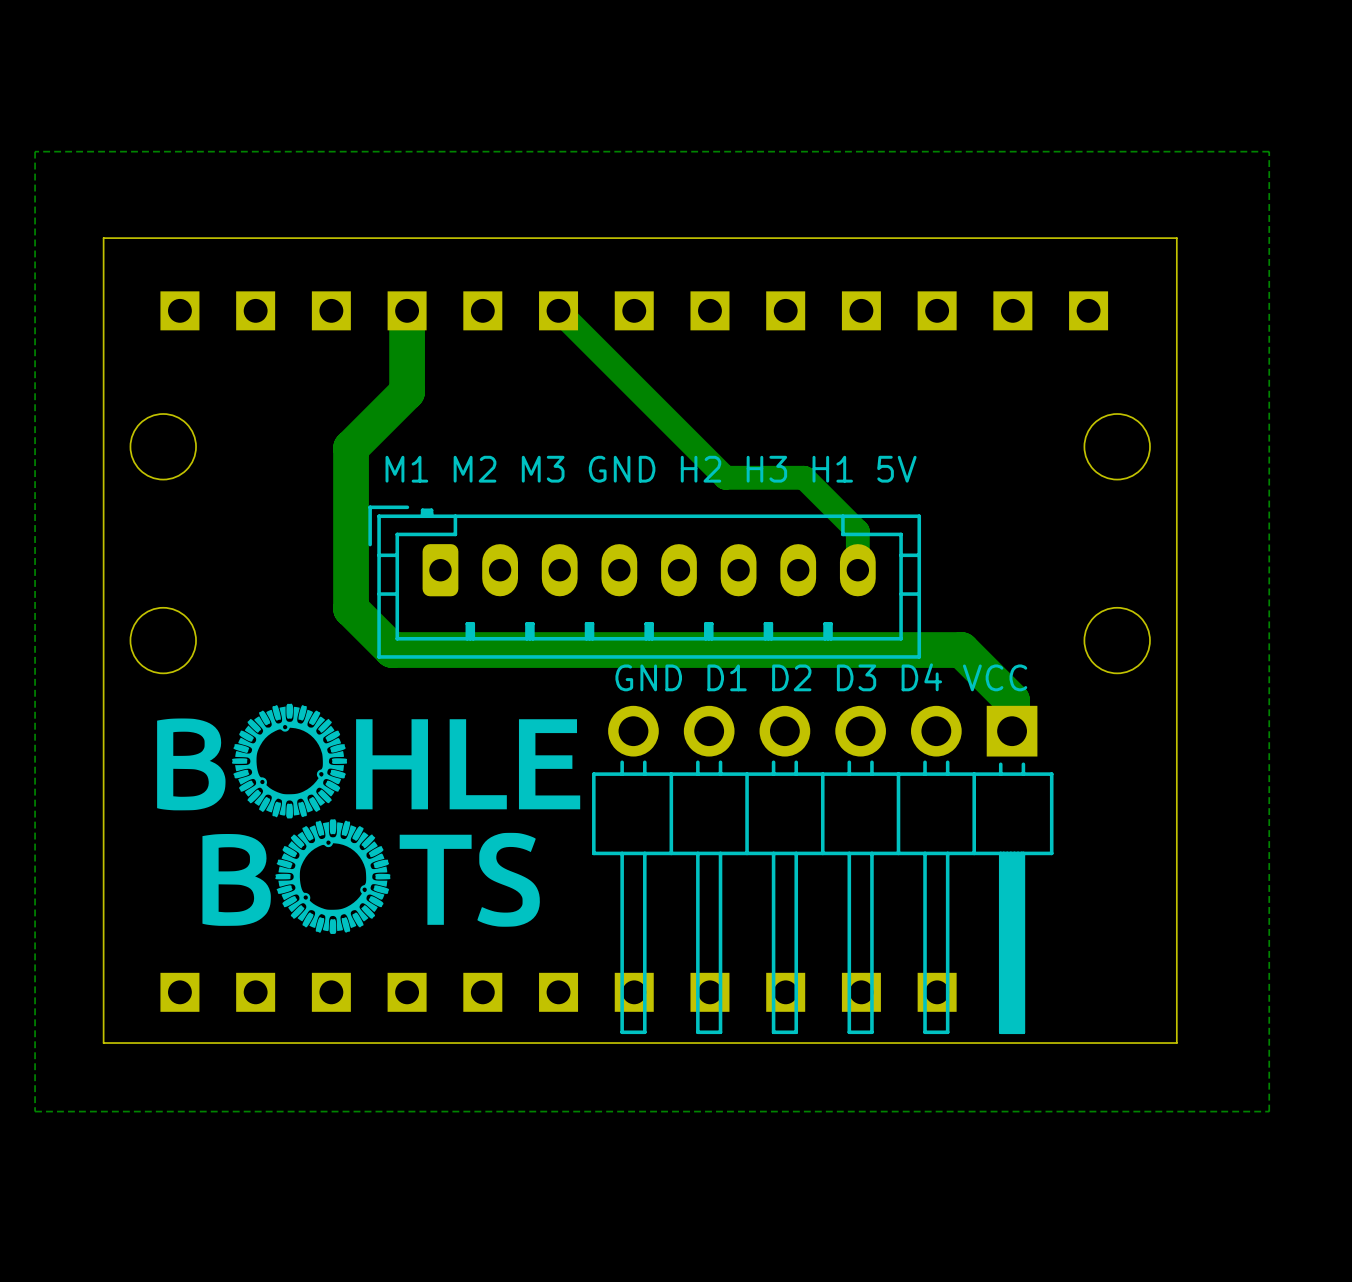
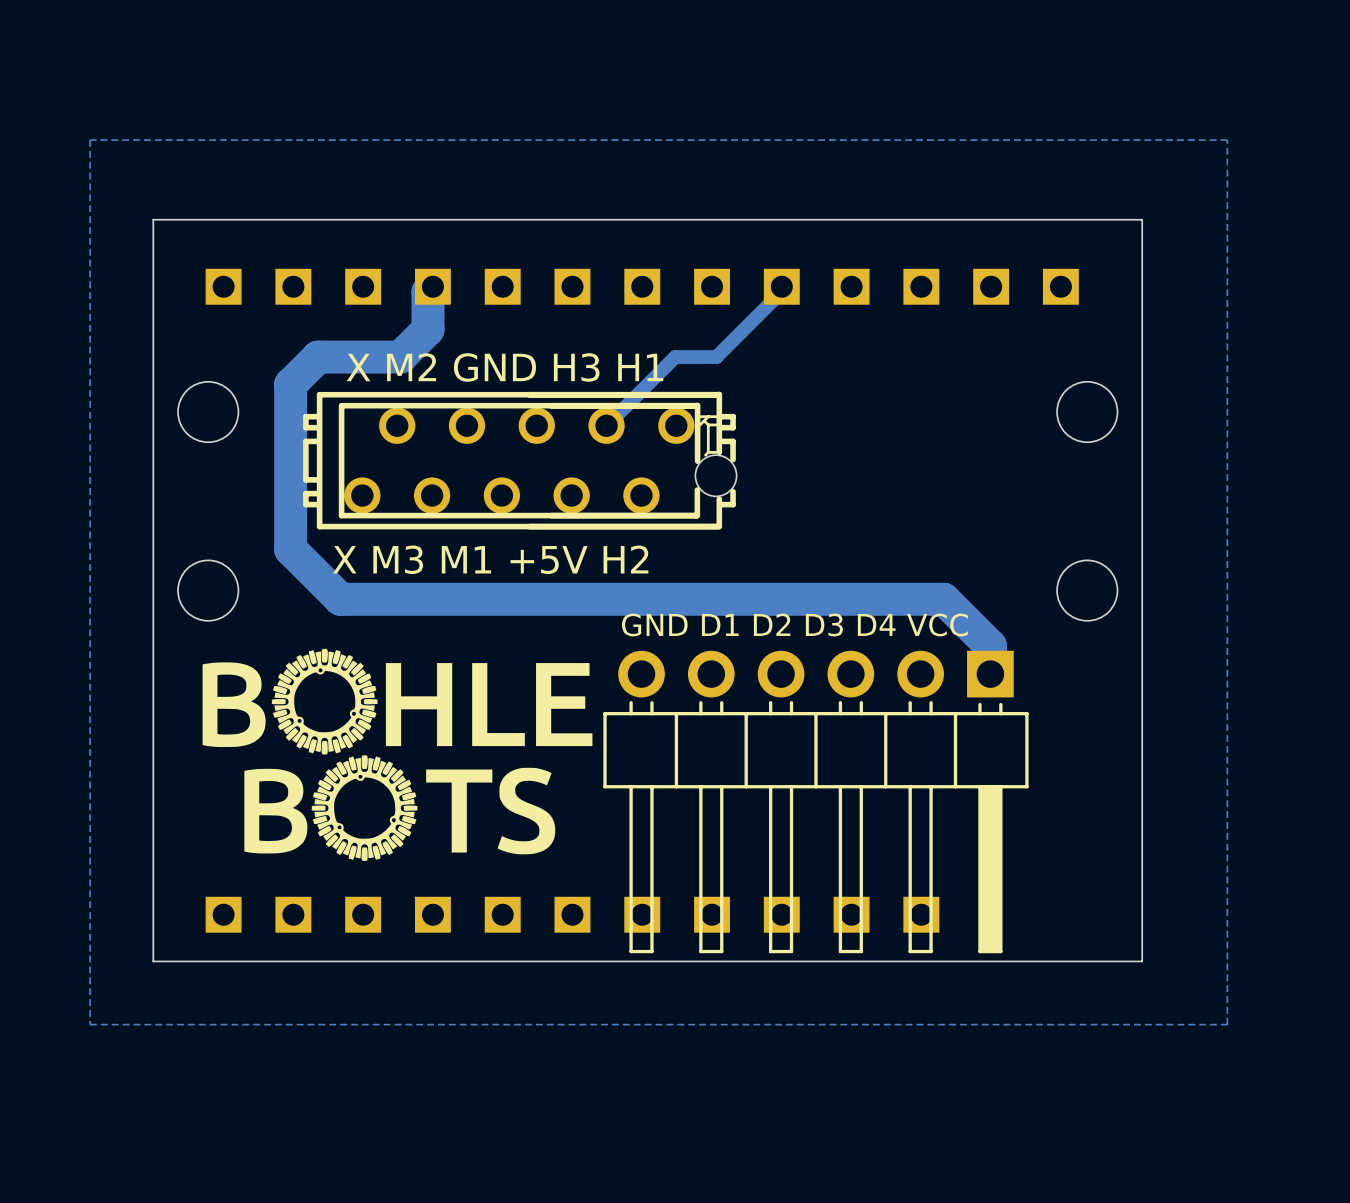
track: (407, 310) (407, 391) (351, 447) (351, 608) (392, 650) -> (432, 286) (427, 291) (427, 329) (400, 357) (318, 357) (290, 384) (290, 549) (340, 599) (419, 599)
track: (558, 310) (725, 477) (804, 477) (857, 531) (857, 570) -> none
track: none -> (781, 286) (781, 291) (716, 357) (675, 357) (606, 425)
text: none -> X M2 GND H3 H1 (505, 367)
text: M1 M2 M3 GND H2 H3 H1 5V (651, 469) -> none
part: none -> (519, 460)
part: (644, 582) -> none
text: none -> X M3 M1 +5V H2 (490, 559)

